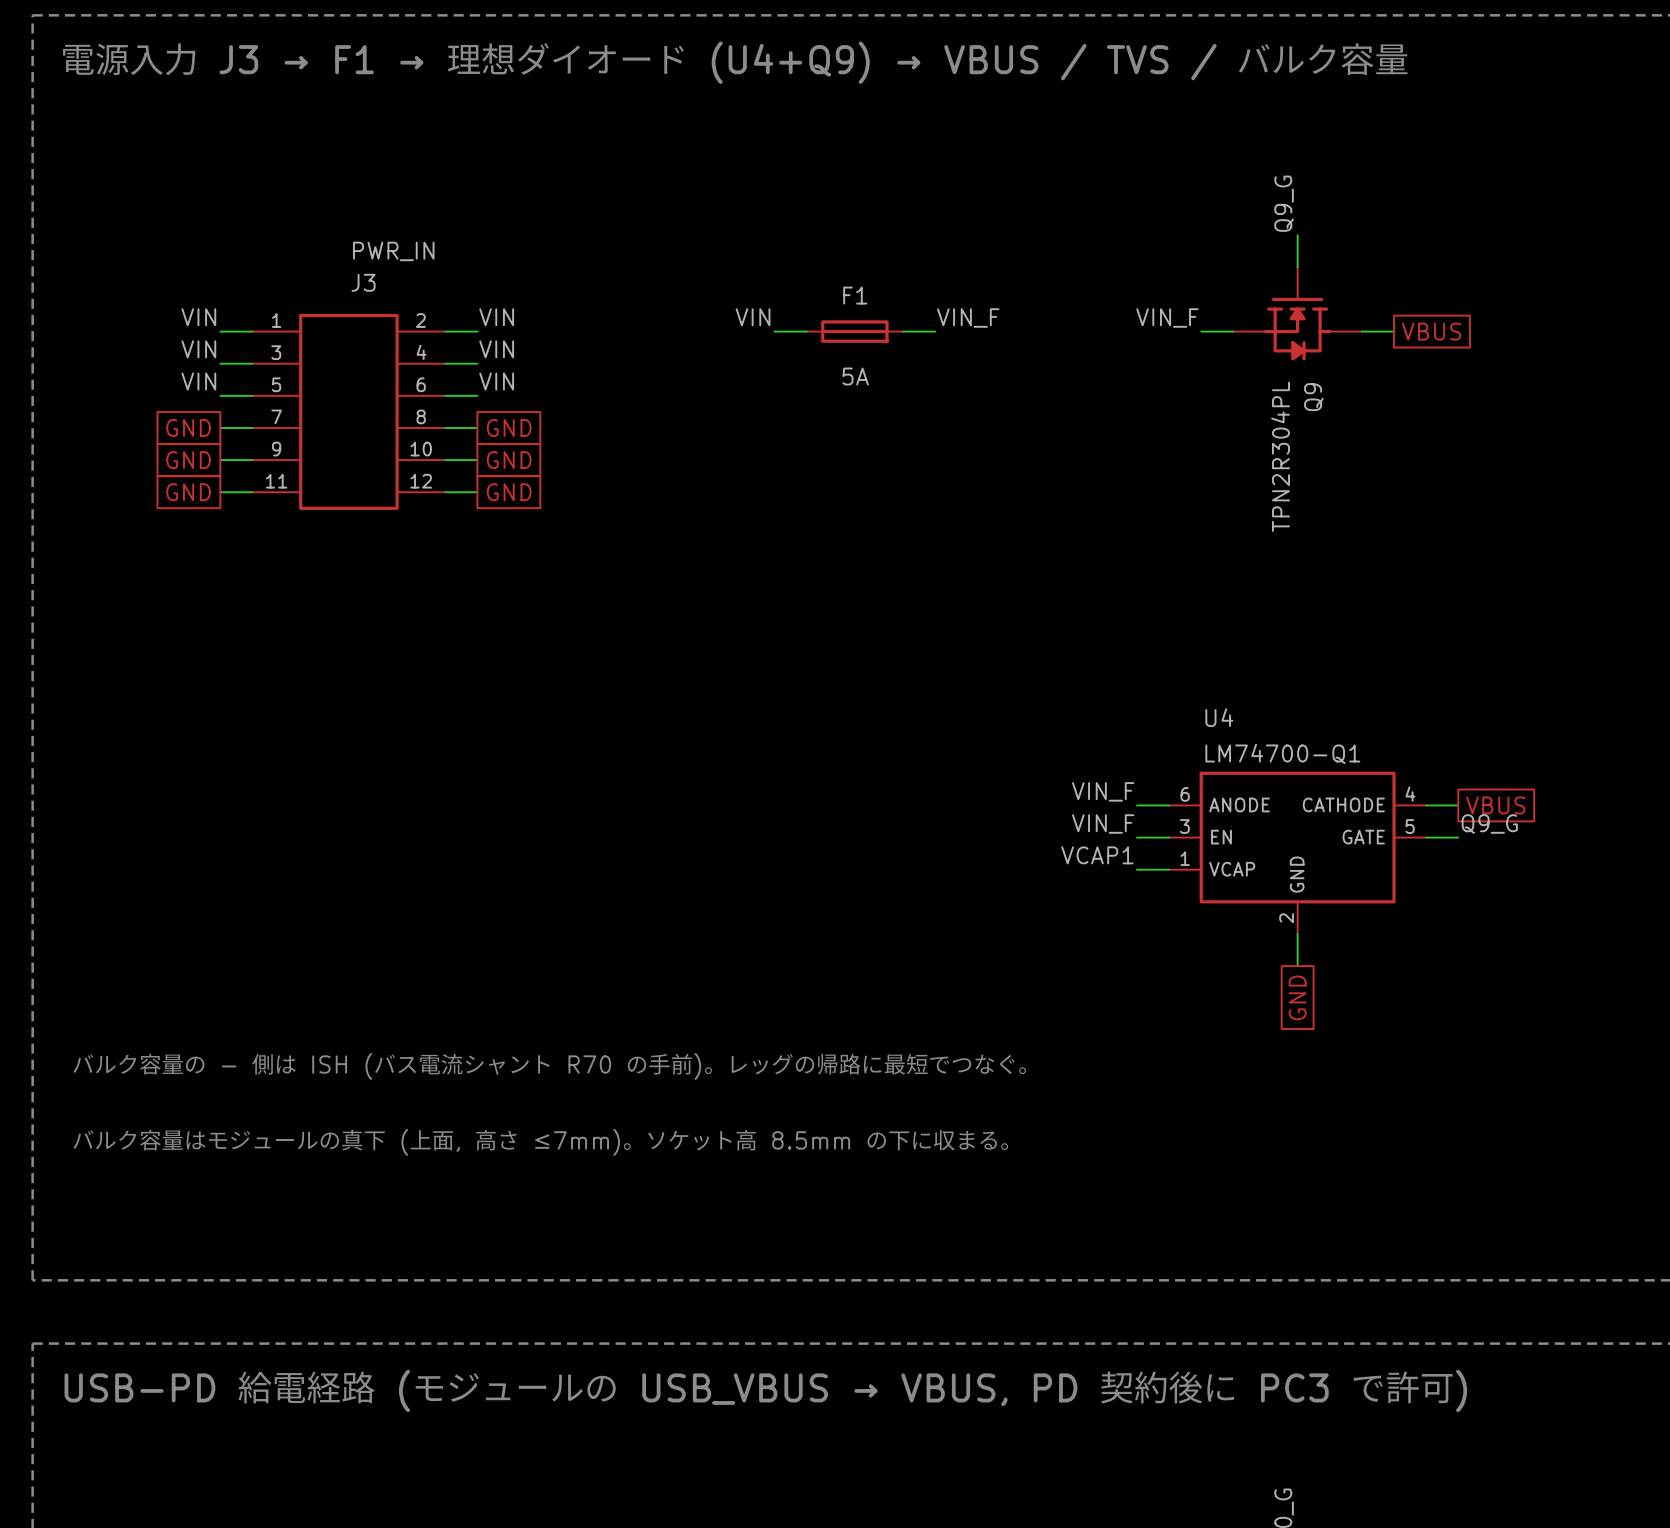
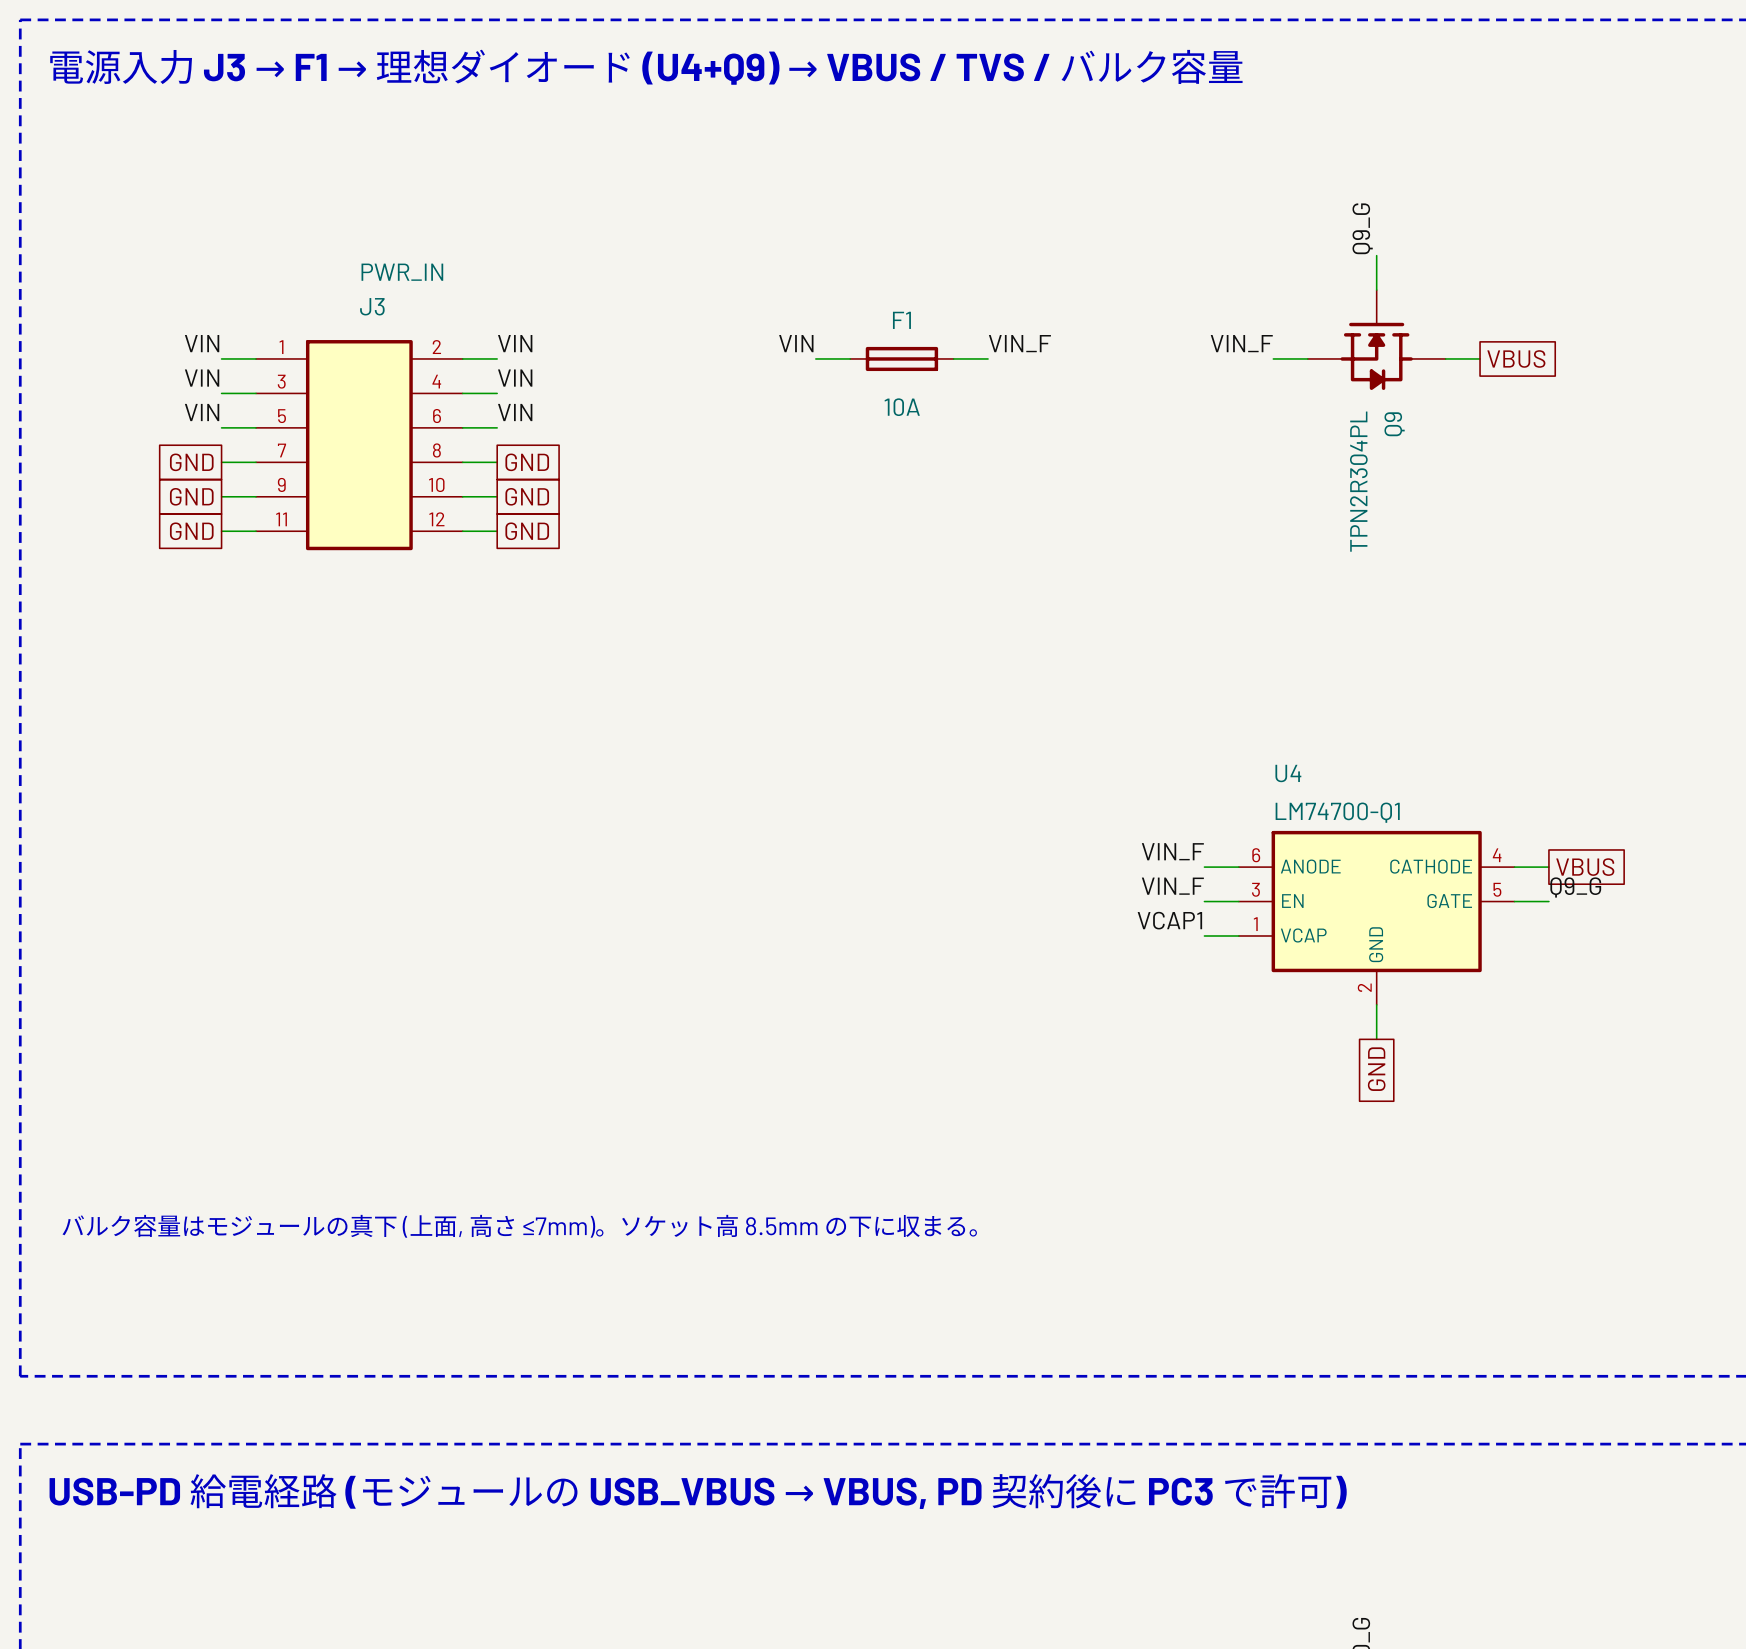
F1 value: 5A (855, 376) -> 10A (902, 407)
text: バルク容量の − 側は ISH (バス電流シャント R70 の手前)。レッグの帰路に最短でつなぐ。 (549, 1066) -> none

